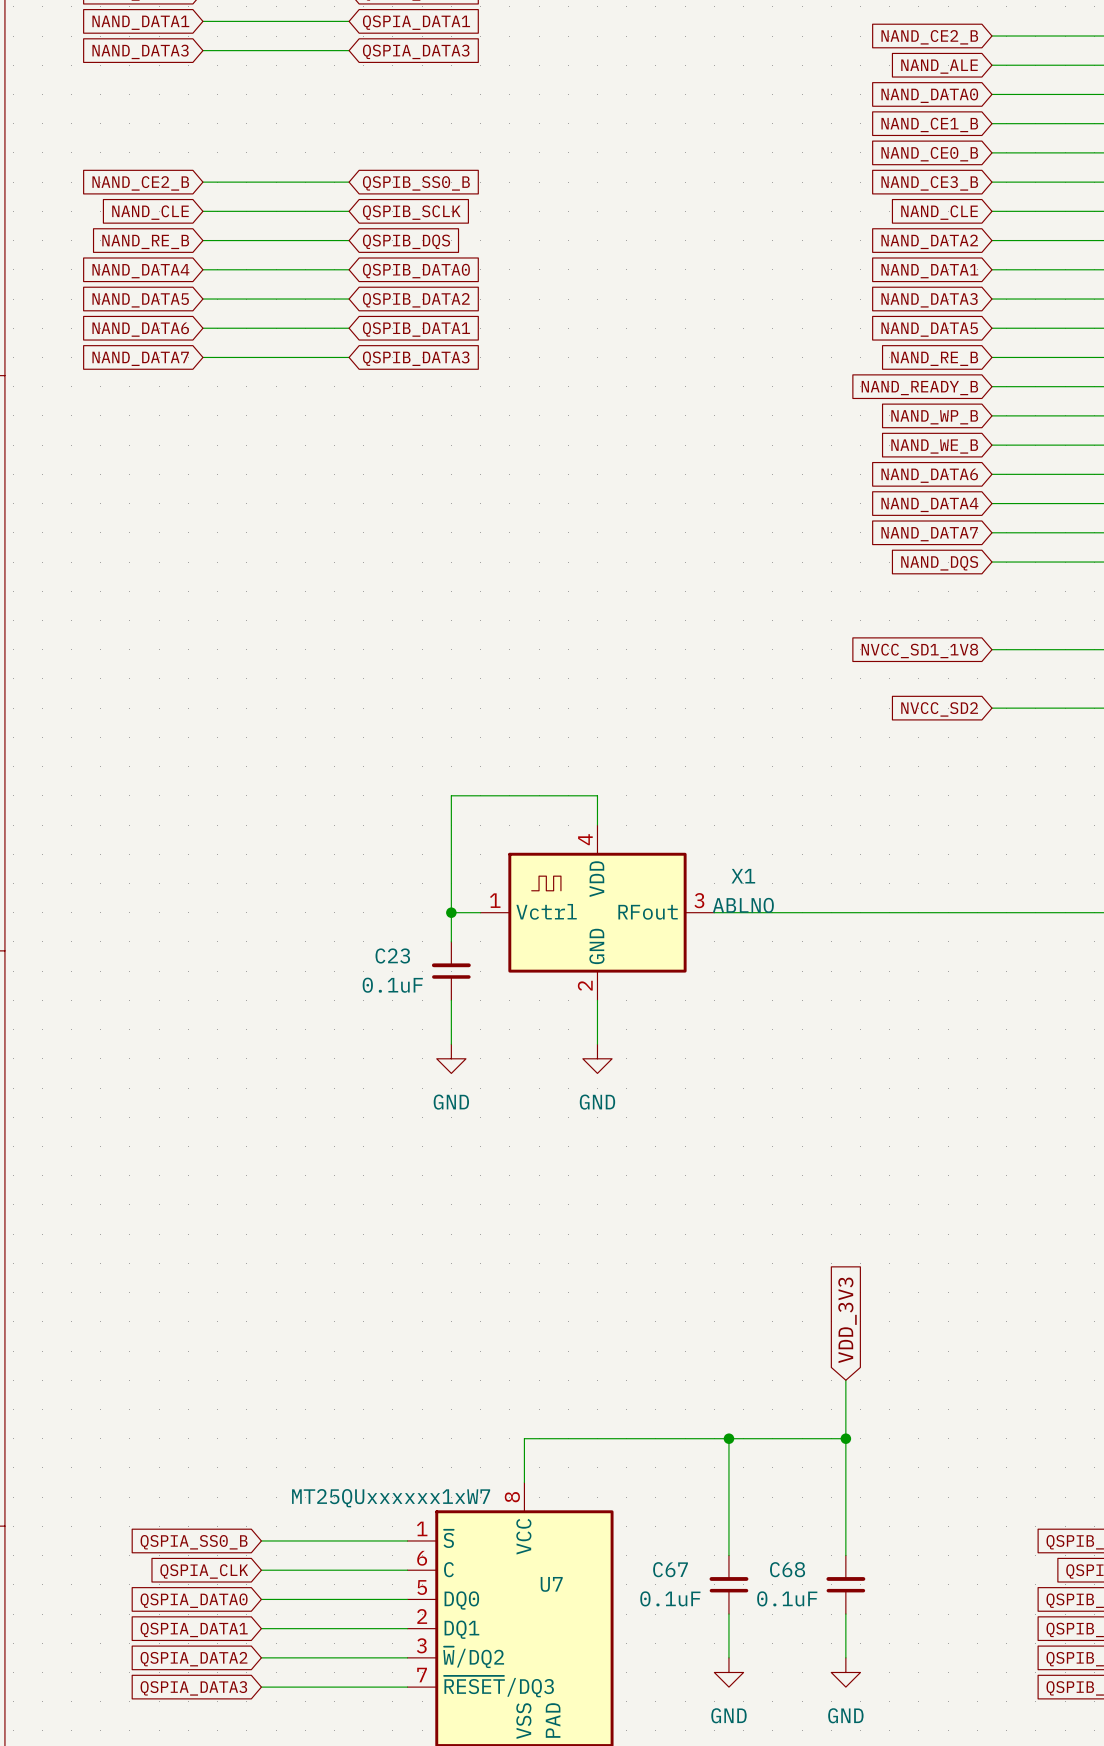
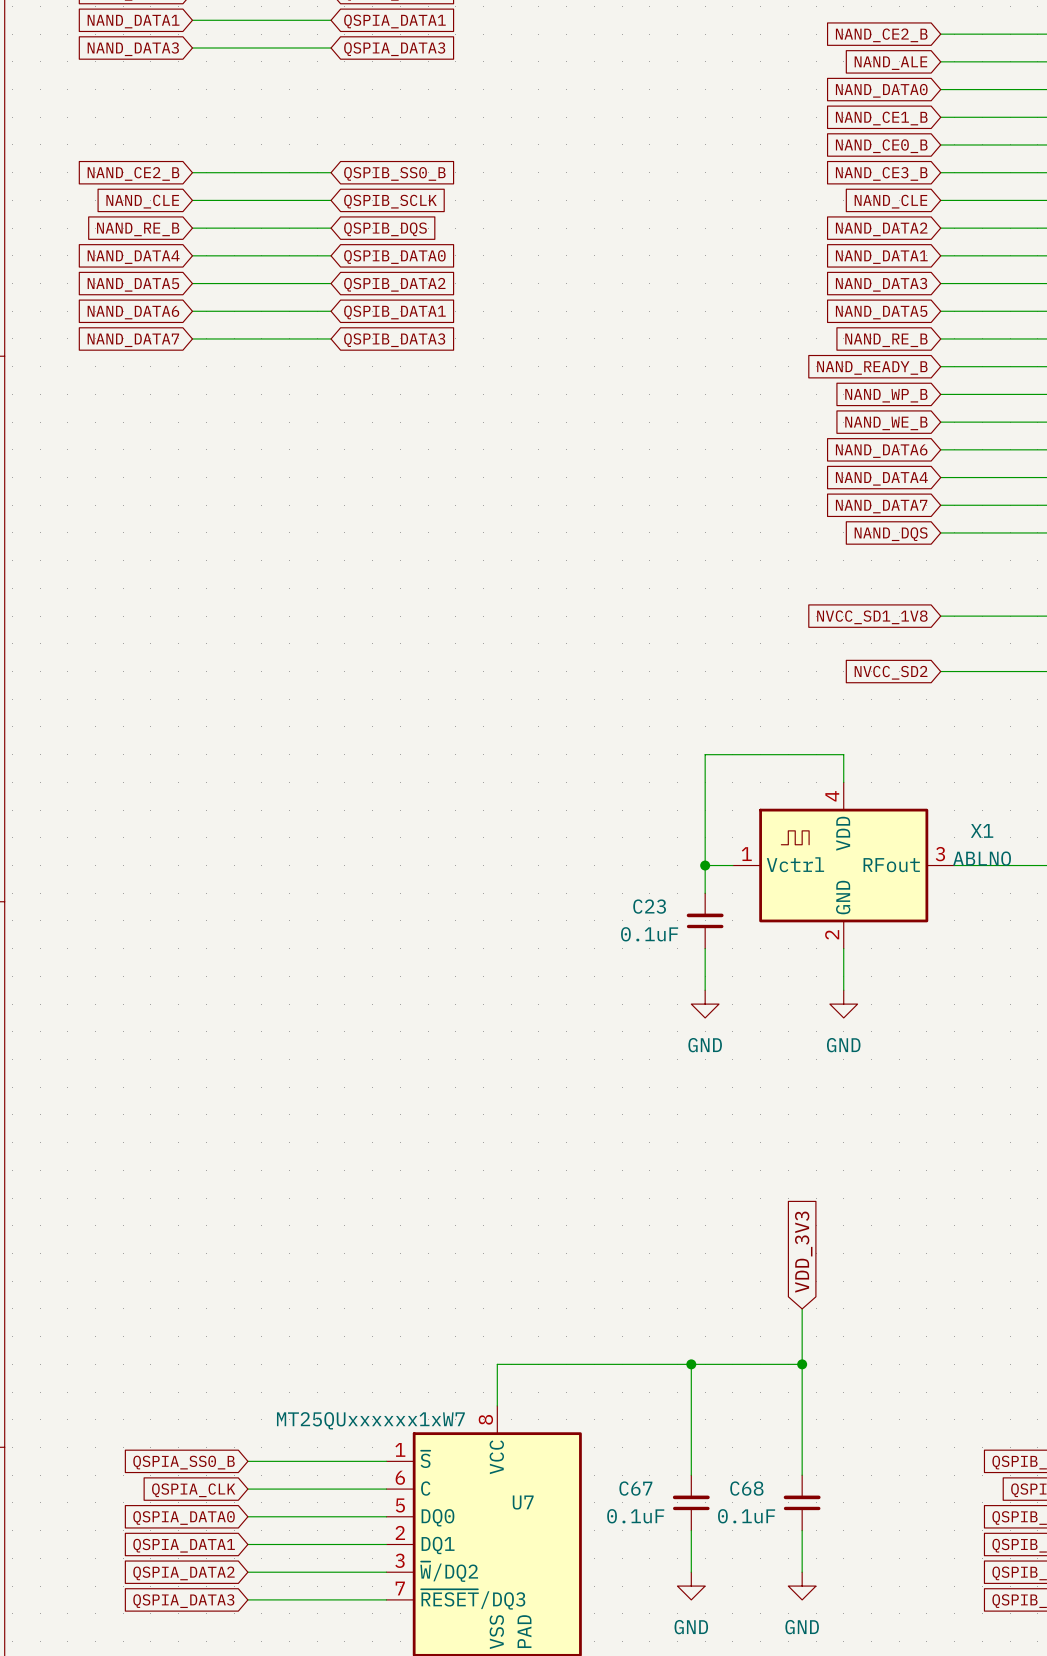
wire: (597, 825) (597, 795) (451, 795) (451, 941) -> none
wire: none -> (843, 782) (843, 754) (705, 754) (705, 893)
wire: (451, 912) (480, 912) -> none
junction: (451, 912) -> none
X1 position: (597, 912) -> (843, 865)
wire: (714, 912) (743, 912) -> none
junction: none -> (705, 865)
C23 position: (451, 971) -> (705, 920)
wire: (451, 1000) (451, 1044) -> none
wire: (597, 1000) (597, 1044) -> (705, 948) (705, 990)
wire: none -> (843, 948) (843, 990)
power symbol: GND (451, 1058) -> none
power symbol: GND (597, 1058) -> none
power symbol: none -> GND (705, 1004)
power symbol: none -> GND (843, 1004)

